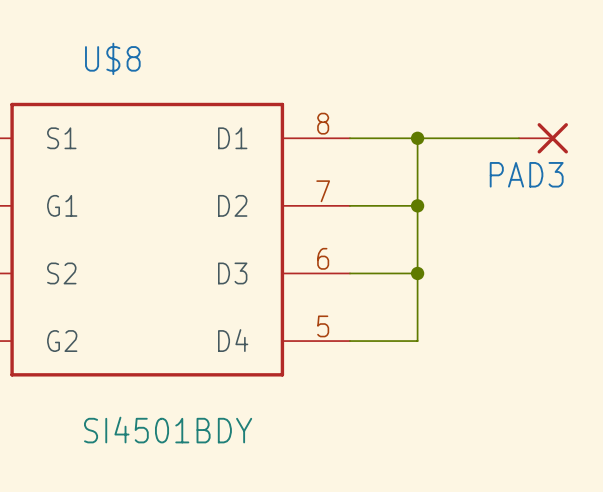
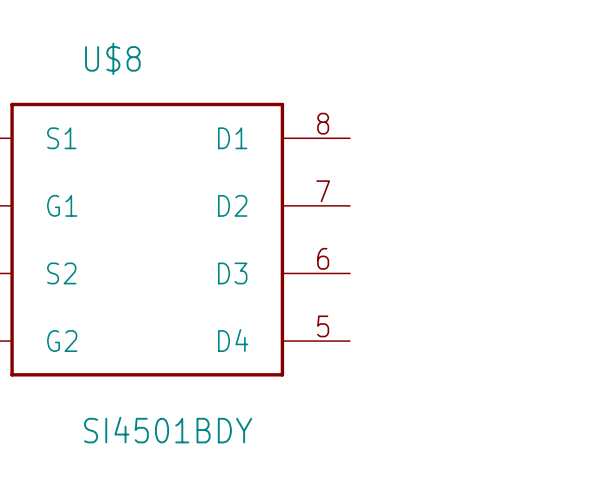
wire: (350, 138) (518, 138) -> none
wire: (417, 138) (417, 341) (350, 341) -> none
junction: (417, 138) -> none
PAD3: (543, 138) -> none
wire: (350, 205) (417, 205) -> none
junction: (417, 205) -> none
wire: (350, 273) (417, 273) -> none
junction: (417, 273) -> none

